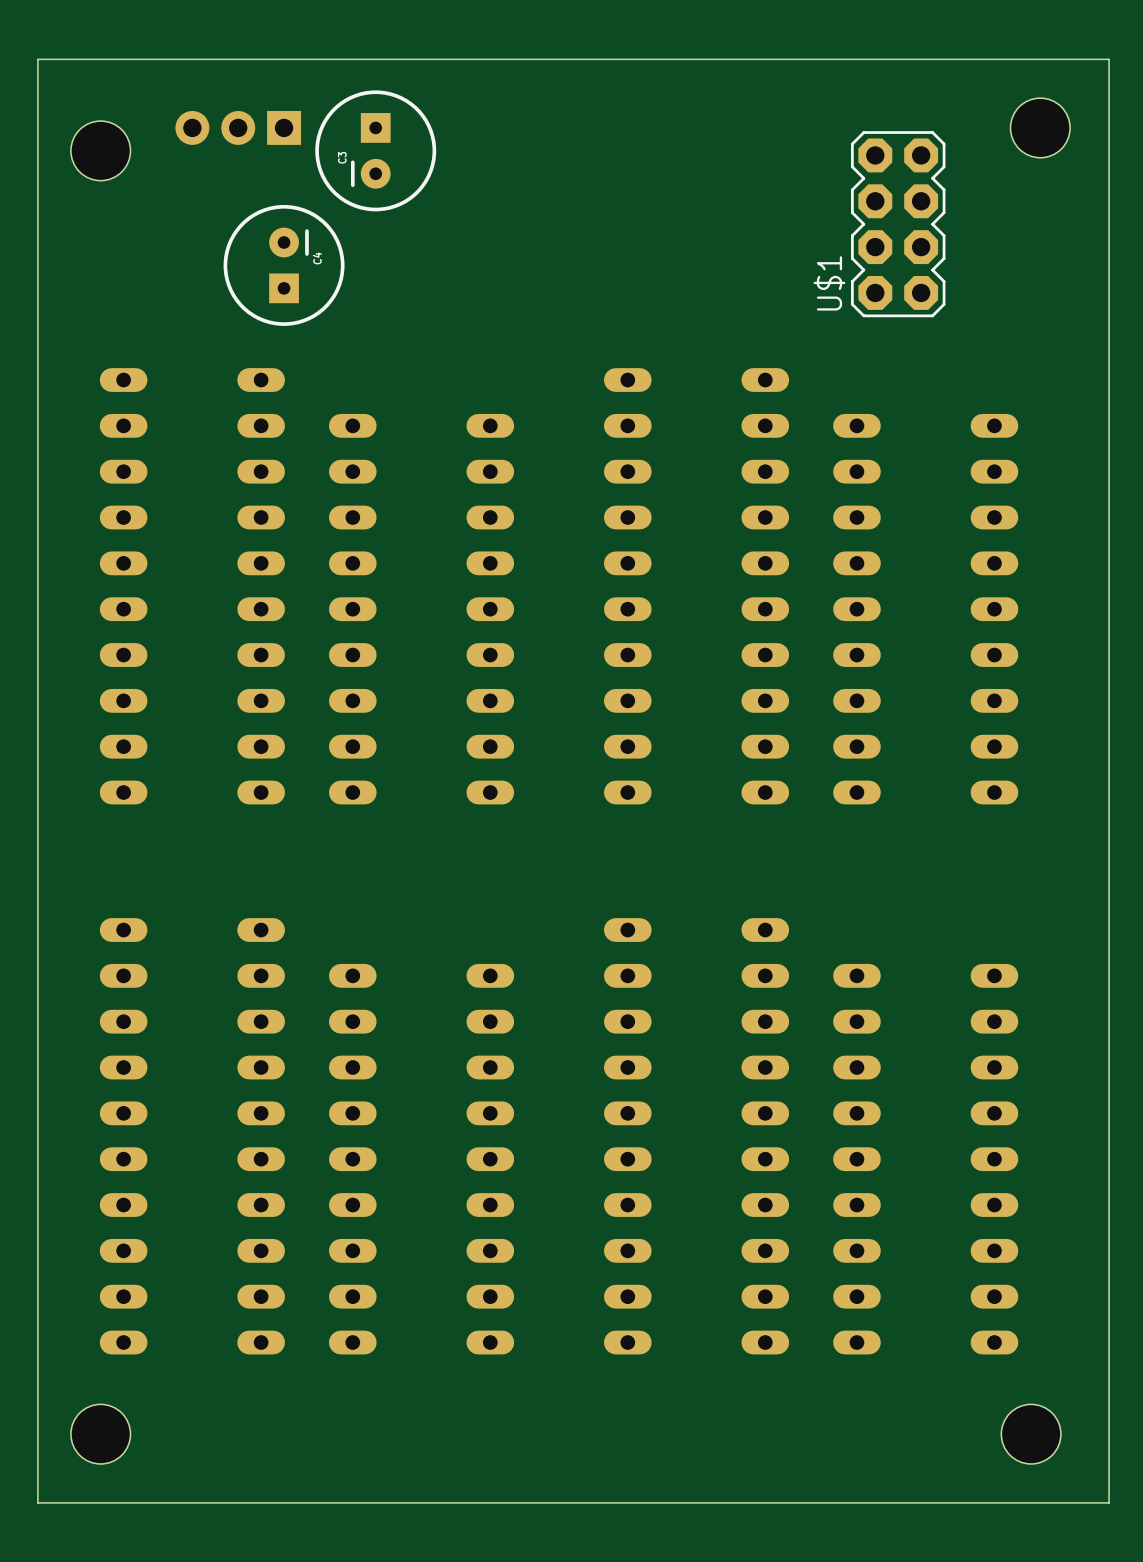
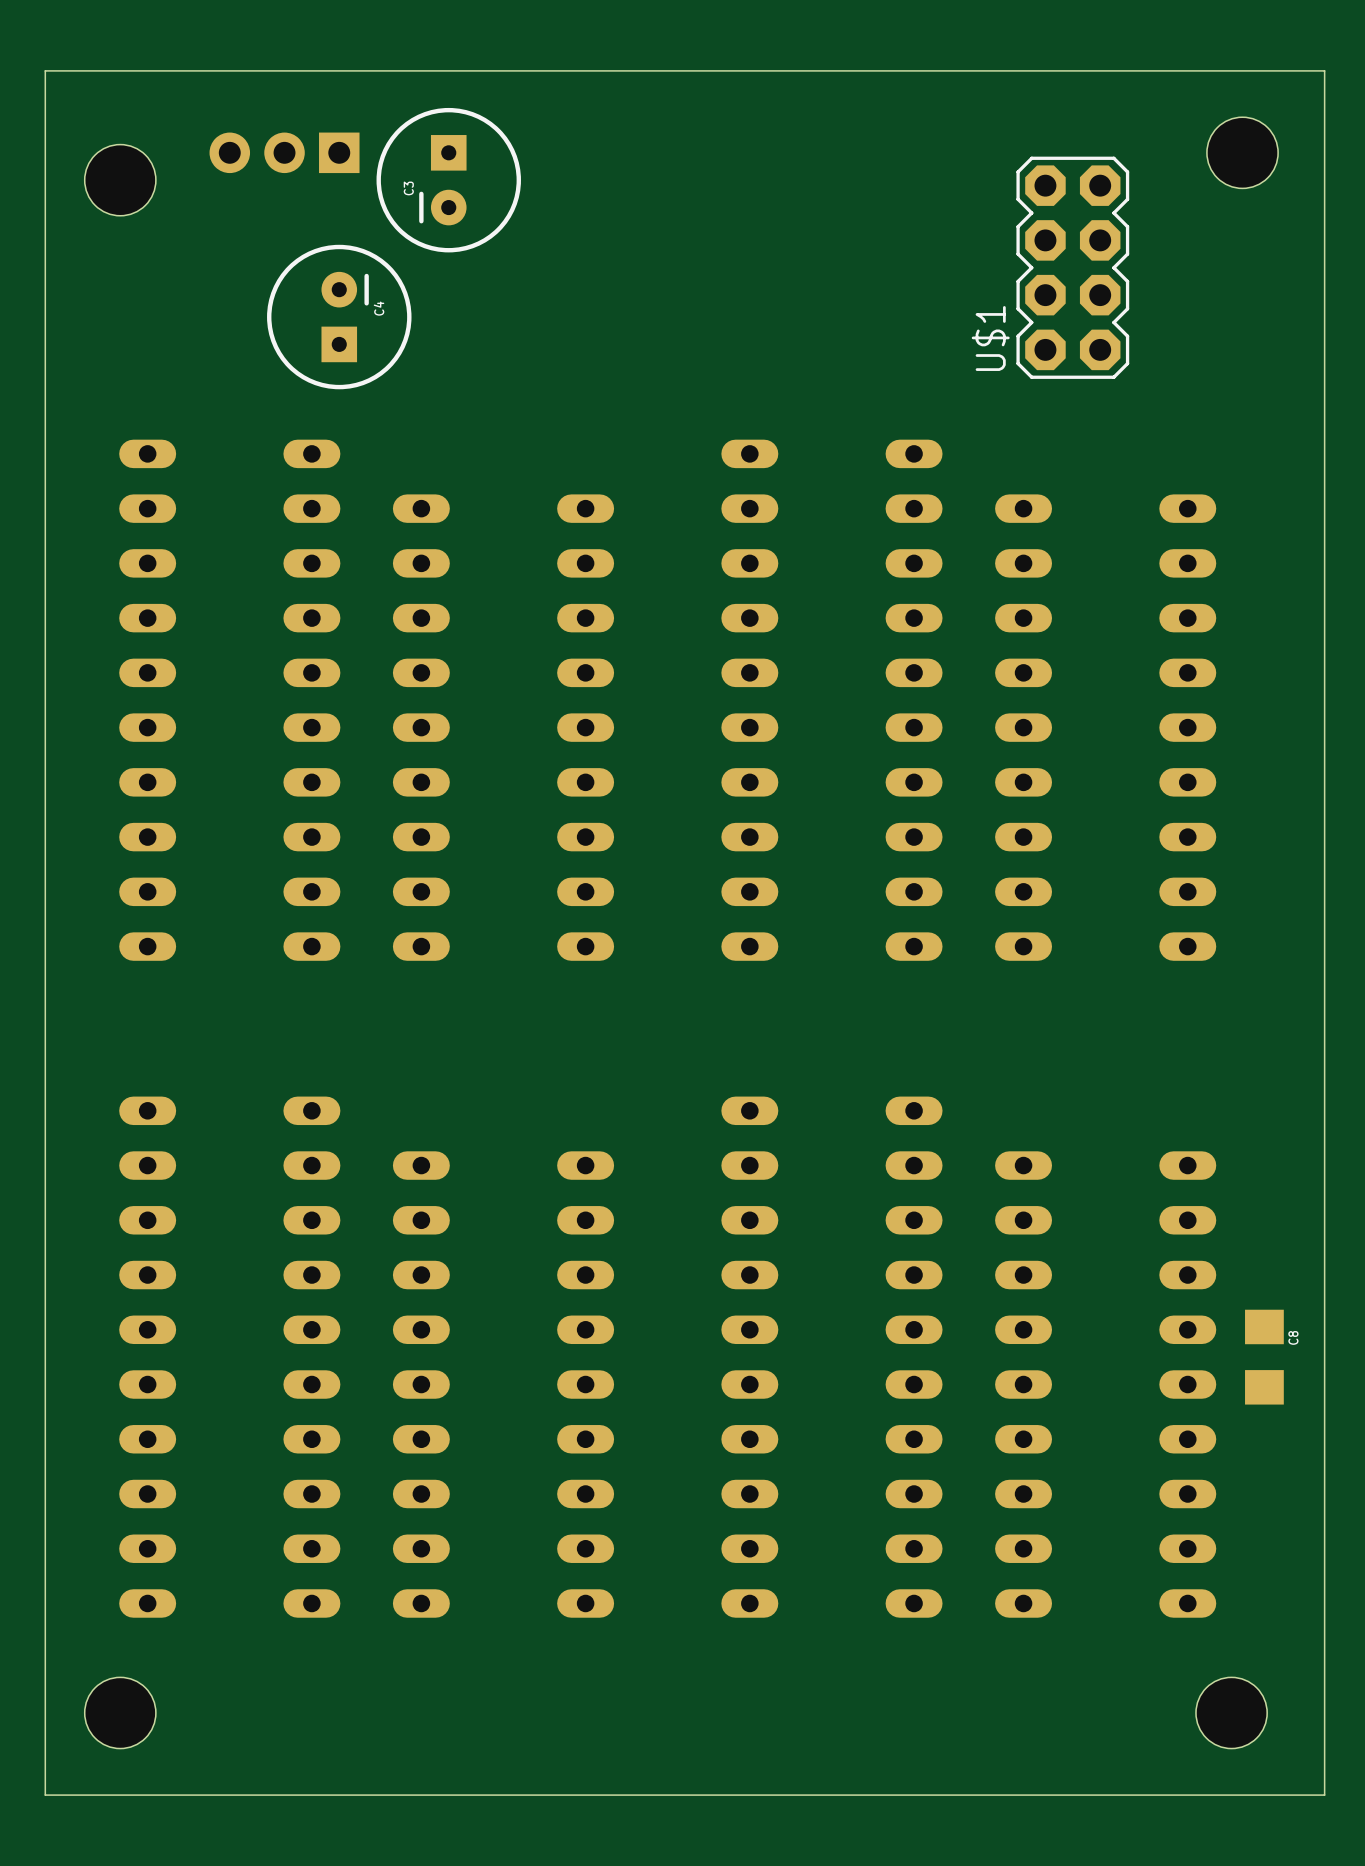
C8: none -> (1264, 1357)

